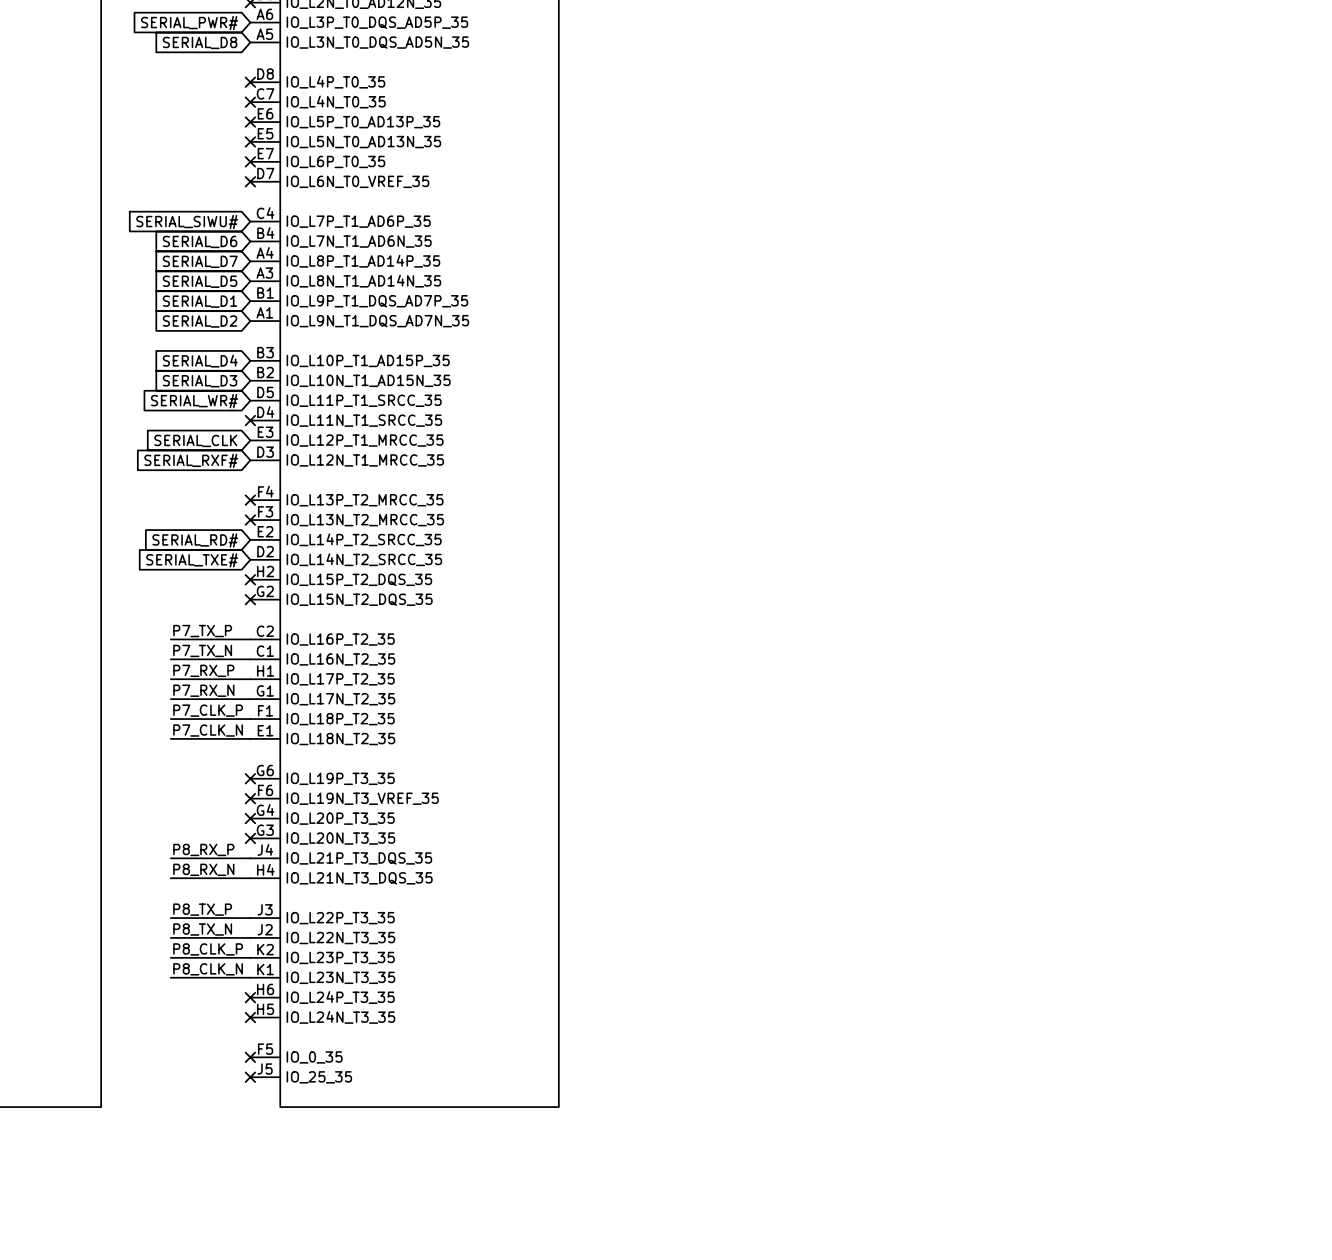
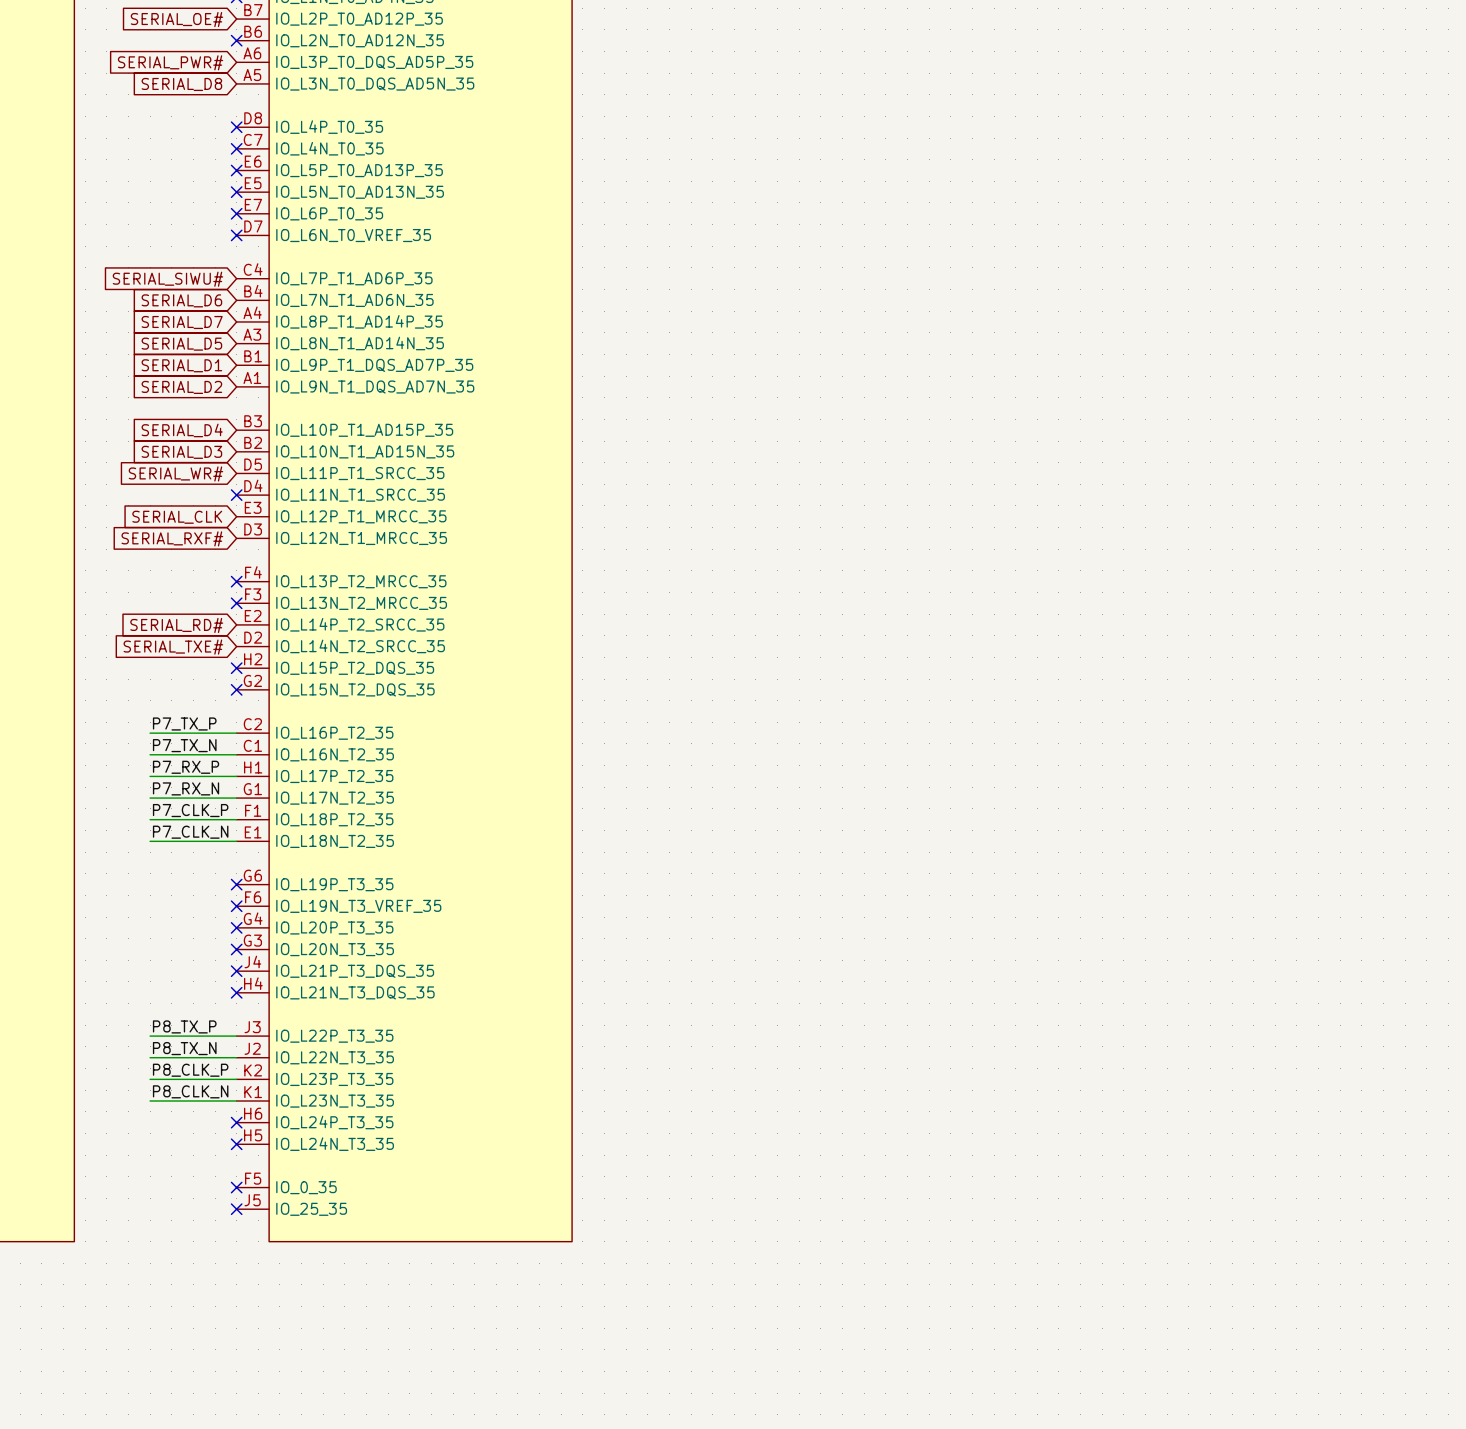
label: P8_RX_P (203, 849) -> none
wire: (170, 858) (250, 858) -> none
no-connect mark: none -> (236, 971)
label: P8_RX_N (203, 869) -> none
wire: (170, 878) (250, 878) -> none
no-connect mark: none -> (236, 992)

